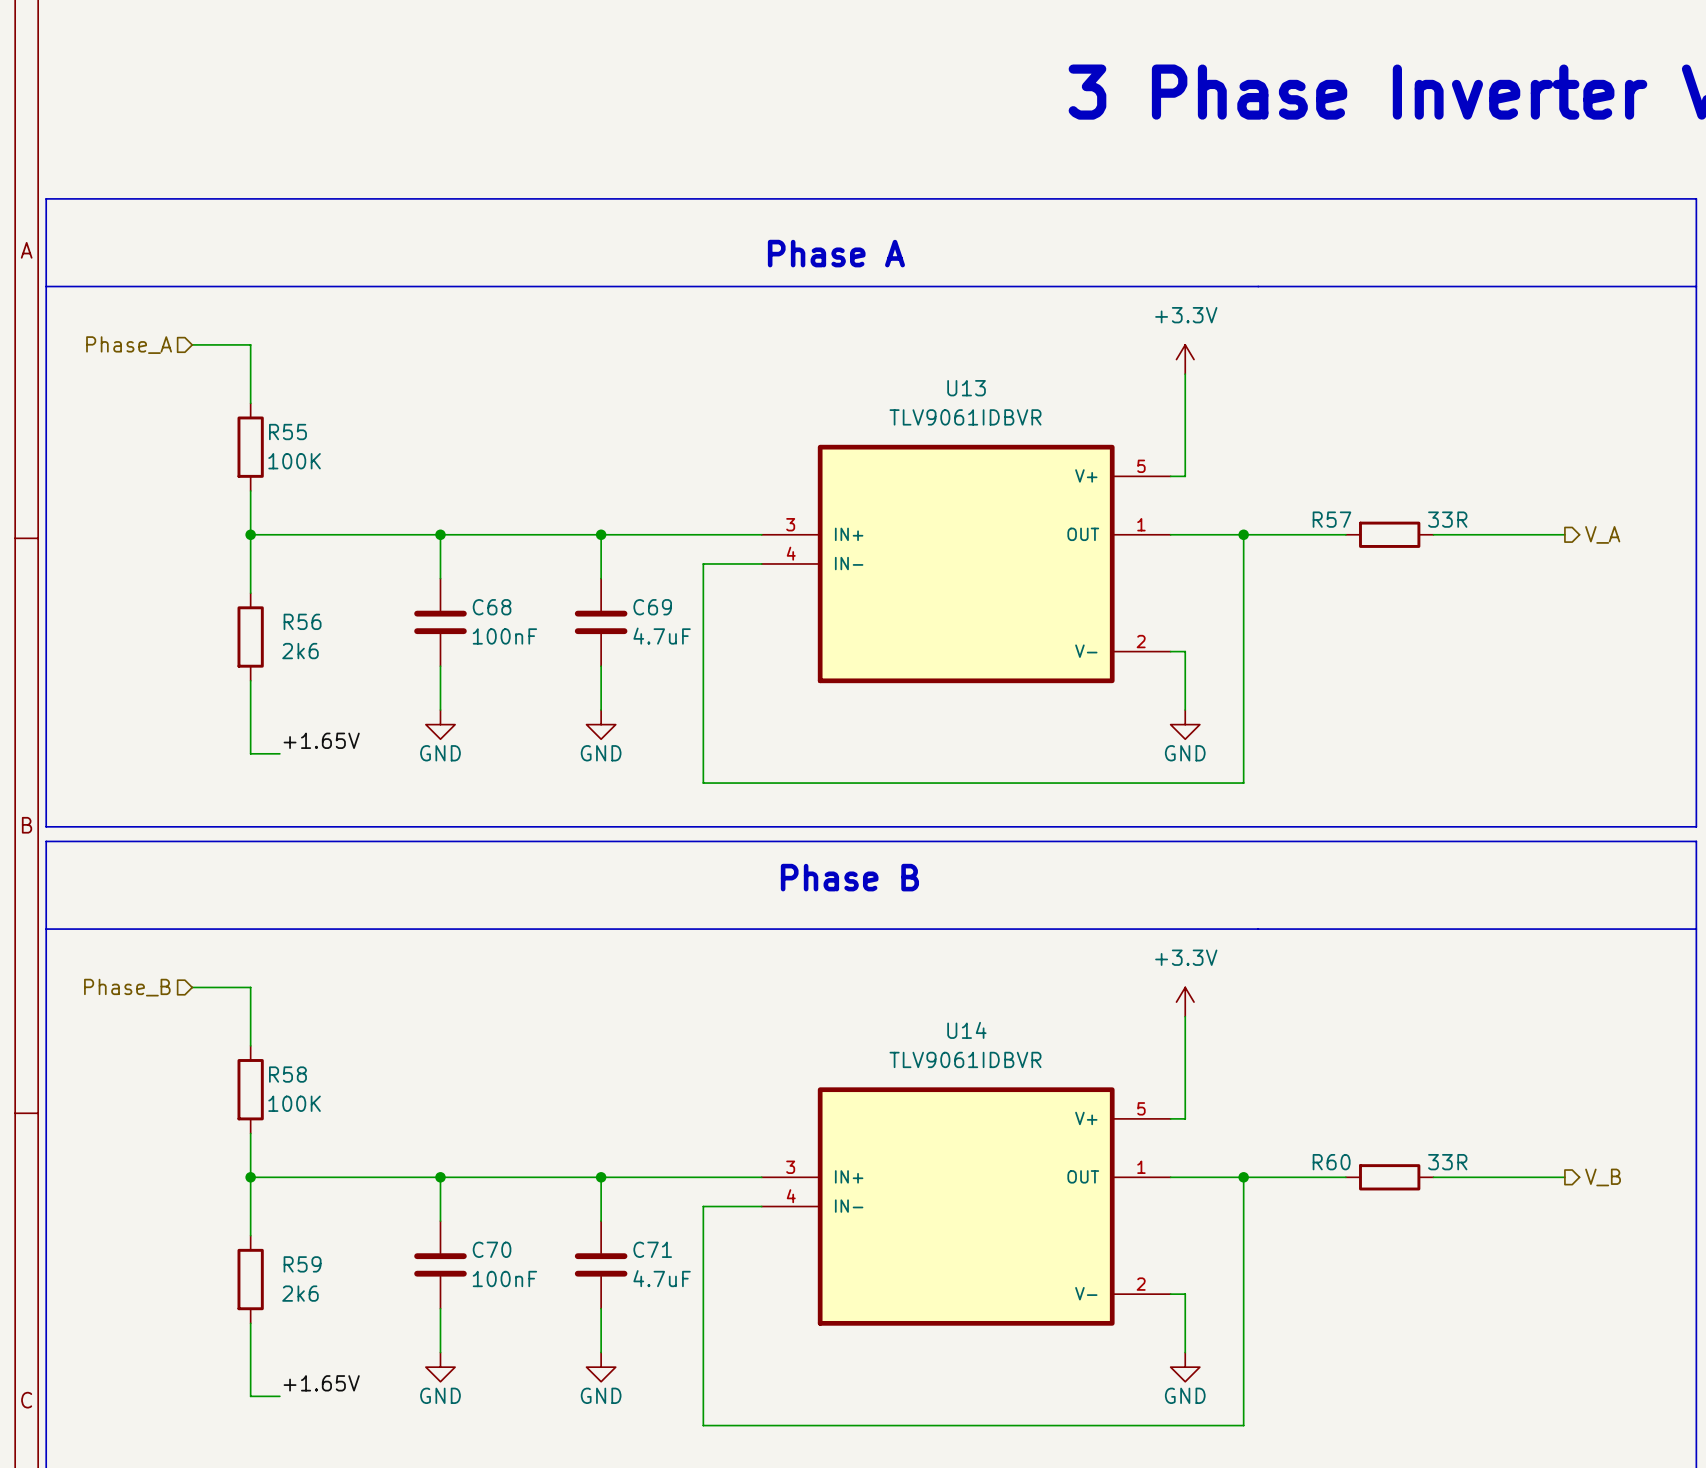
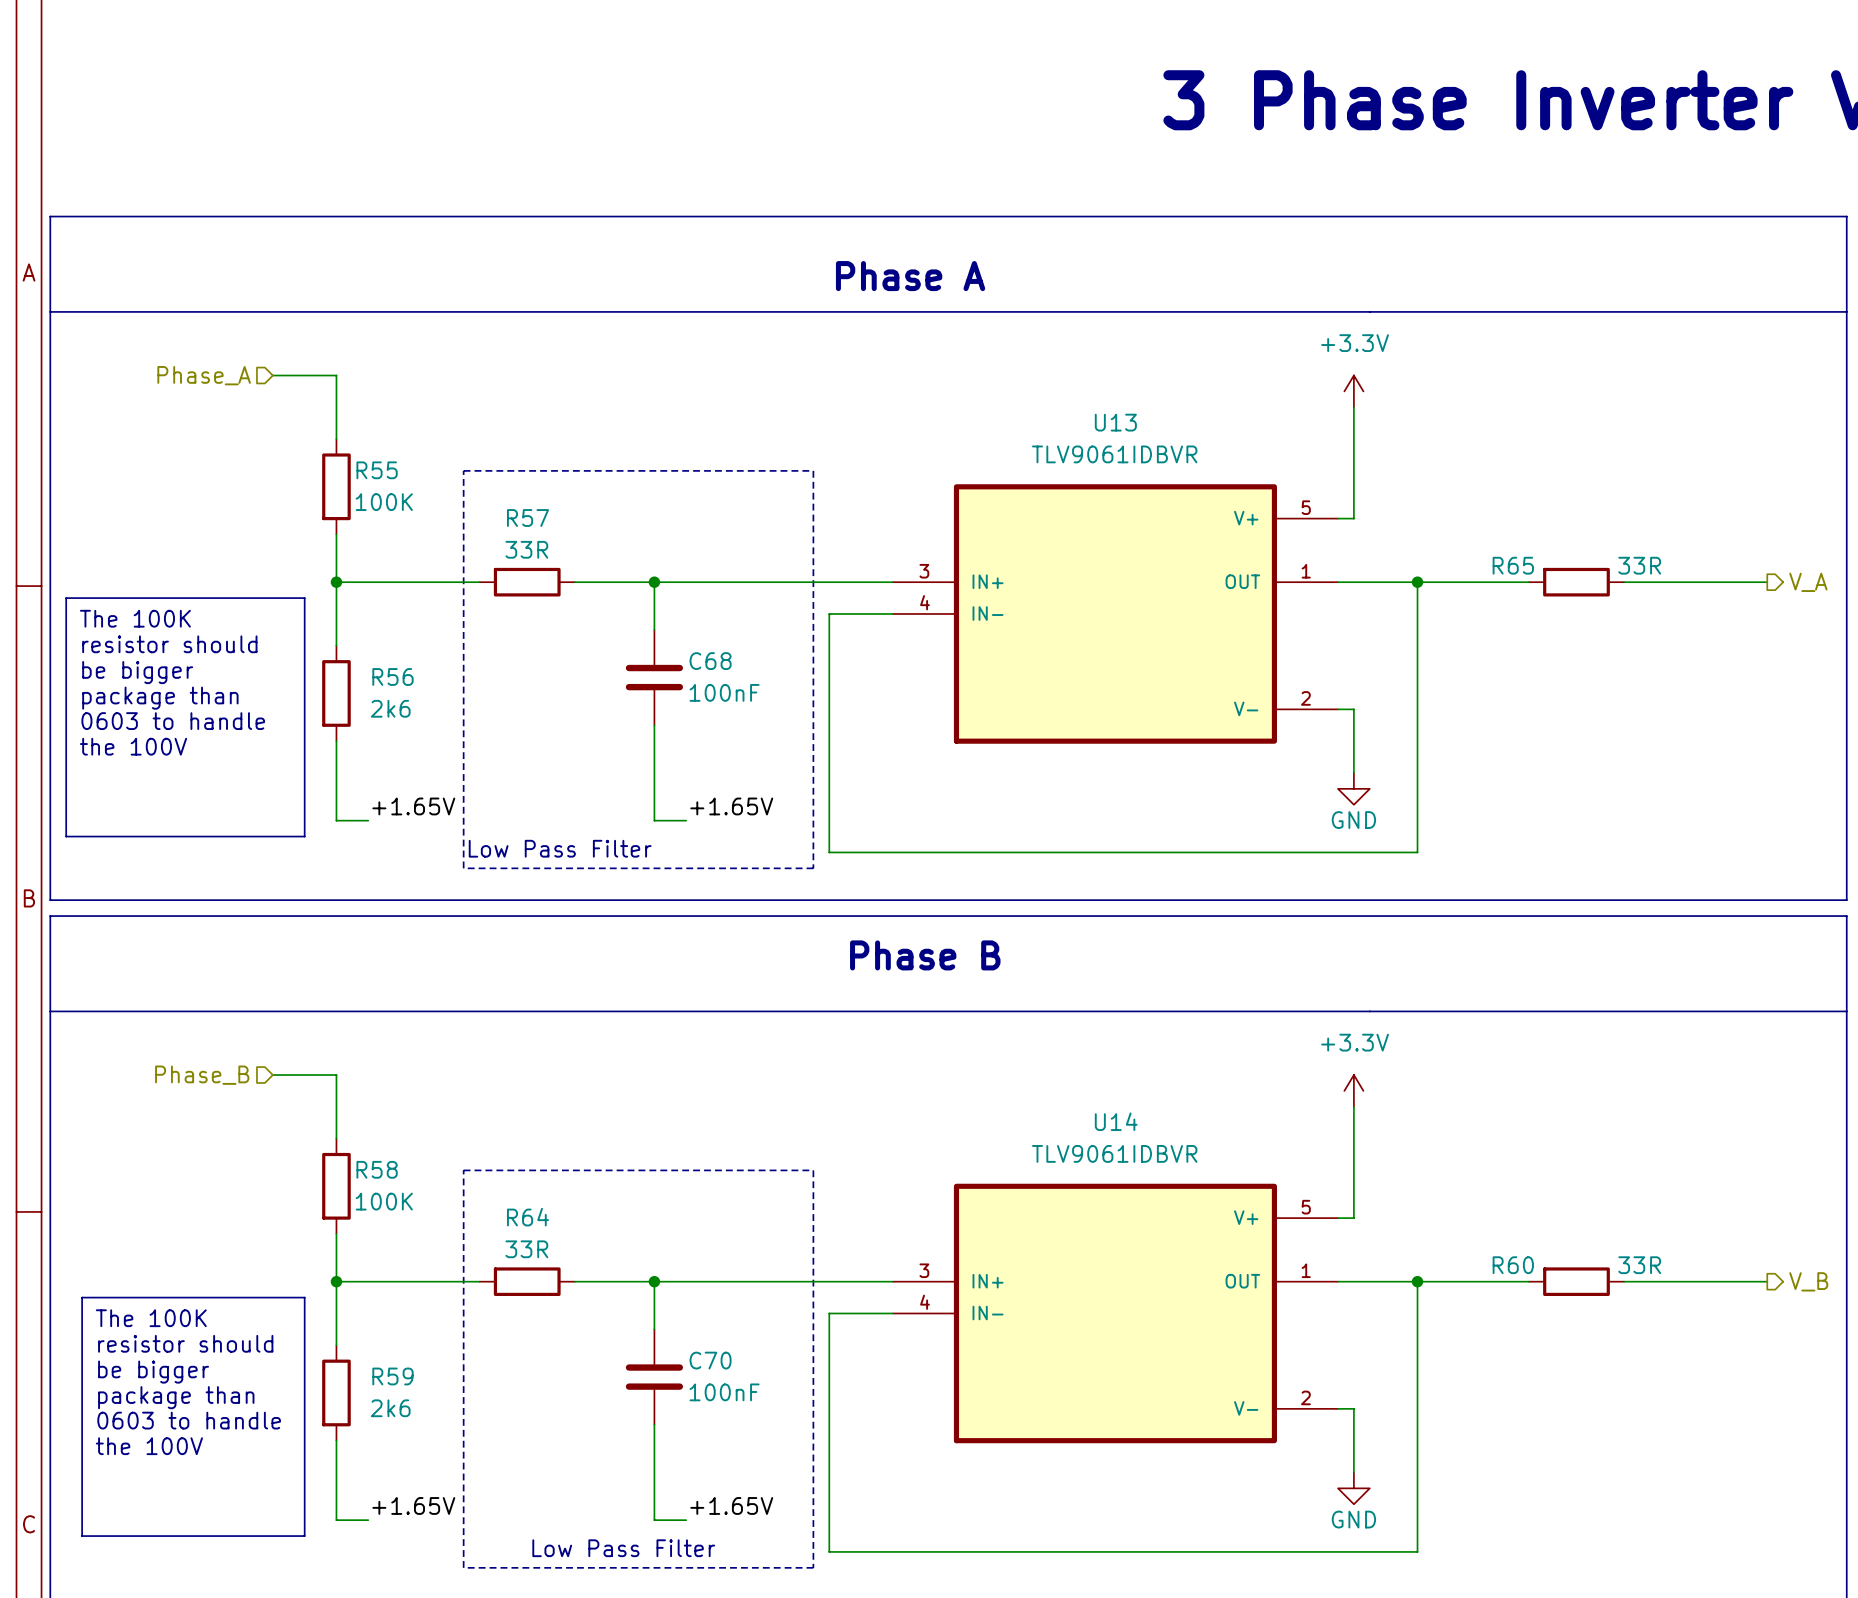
wire: (192, 344) (250, 344) (250, 403) -> (272, 375) (336, 375) (336, 439)
hierarchical label position: Phase_A (129, 345) -> Phase_A (204, 375)
power symbol position: +3.3V (1185, 359) -> +3.3V (1353, 391)
wire: (1185, 374) (1185, 476) (1170, 476) -> (1353, 407) (1353, 518) (1338, 518)
line: none -> (463, 470) (813, 470) (813, 868) (463, 868) (463, 470)
R55 position: (250, 447) -> (336, 486)
wire: (250, 490) (250, 593) -> (336, 534) (336, 645)
R57 name position: R57 (1331, 519) -> R57 (527, 518)
R57 value position: 33R (1447, 519) -> 33R (526, 549)
wire: (250, 534) (309, 534) -> none
junction position: (250, 534) -> (336, 582)
junction: (440, 534) -> none
wire: (528, 534) (440, 534) (440, 578) -> none
wire: (1243, 534) (1243, 651) -> (1338, 709) (1353, 709)
junction position: (1243, 534) -> (1417, 582)
R57 position: (1389, 534) -> (527, 582)
wire: (1433, 534) (1491, 534) -> (1465, 582) (1528, 582)
R65: none -> 33R (1576, 582)
wire: none -> (1703, 582) (1767, 582)
hierarchical label position: V_A (1602, 534) -> V_A (1808, 582)
line: none -> (66, 598) (304, 598) (304, 836) (66, 836) (66, 598)
wire: (761, 563) (703, 563) (703, 783) (761, 783) -> (892, 613) (829, 613) (829, 852)
U13 position: (966, 563) -> (1115, 613)
text: none -> The 100K (135, 618)
text: none -> resistor should (169, 644)
C69 name: C69 (652, 607) -> C68 (710, 661)
text: none -> be bigger (137, 672)
C68: 100nF (440, 622) -> none
C69 value: 4.7uF (662, 636) -> 100nF (724, 692)
R56 position: (250, 637) -> (336, 693)
text: none -> package than (160, 698)
wire: (1170, 651) (1185, 651) (1185, 710) -> none
text: none -> 0603 to handle (173, 721)
wire: (440, 666) (440, 710) -> none
wire: (250, 680) (250, 753) (279, 753) -> (336, 741) (336, 820) (368, 820)
text: none -> the 100V (133, 746)
wire: none -> (654, 772) (654, 820) (686, 820)
wire: (1243, 710) (1243, 783) -> (1417, 582) (1417, 852) (1353, 852)
power symbol: GND (440, 724) -> none
power symbol: GND (601, 724) -> none
power symbol position: GND (1185, 724) -> GND (1353, 788)
label position: +1.65V (321, 740) -> +1.65V (413, 806)
label: none -> +1.65V (731, 806)
text: none -> Low Pass Filter (560, 848)
hierarchical label position: Phase_B (127, 987) -> Phase_B (202, 1075)
wire: (192, 987) (250, 987) (250, 1045) -> (272, 1075) (336, 1075) (336, 1138)
power symbol position: +3.3V (1185, 1002) -> +3.3V (1353, 1090)
wire: (1185, 1016) (1185, 1118) (1170, 1118) -> (1353, 1106) (1353, 1218) (1338, 1218)
line: none -> (463, 1170) (463, 1567) (813, 1567) (813, 1170) (463, 1170)
R58 position: (250, 1089) -> (336, 1186)
wire: (250, 1133) (250, 1235) -> (336, 1233) (336, 1345)
wire: (250, 1177) (309, 1177) -> none
junction position: (250, 1177) -> (336, 1281)
junction: (440, 1177) -> none
R64: none -> 33R (527, 1281)
wire: (528, 1177) (440, 1177) (440, 1221) -> none
wire: (1243, 1177) (1243, 1294) -> (1338, 1408) (1353, 1408)
junction position: (1243, 1177) -> (1417, 1281)
R60 position: (1389, 1177) -> (1576, 1281)
wire: (1433, 1177) (1491, 1177) -> (1465, 1281) (1528, 1281)
wire: none -> (1703, 1281) (1767, 1281)
hierarchical label position: V_B (1603, 1177) -> V_B (1808, 1281)
line: none -> (82, 1297) (304, 1297) (304, 1536) (82, 1536) (82, 1297)
wire: (761, 1206) (703, 1206) (703, 1425) (761, 1425) -> (892, 1313) (829, 1313) (829, 1551)
U14 position: (966, 1206) -> (1115, 1313)
text: none -> The 100K (151, 1318)
text: none -> resistor should (185, 1343)
C71 name: C71 (652, 1249) -> C70 (710, 1360)
text: none -> be bigger (153, 1372)
C70: 100nF (440, 1264) -> none
C71 value: 4.7uF (662, 1278) -> 100nF (724, 1392)
R59 position: (250, 1279) -> (336, 1392)
text: none -> package than (176, 1397)
wire: (1170, 1294) (1185, 1294) (1185, 1352) -> none
text: none -> 0603 to handle (189, 1420)
wire: (440, 1308) (440, 1352) -> none
wire: (250, 1323) (250, 1396) (279, 1396) -> (336, 1440) (336, 1520) (368, 1520)
text: none -> the 100V (149, 1446)
wire: none -> (654, 1472) (654, 1520) (686, 1520)
wire: (1243, 1352) (1243, 1425) -> (1417, 1281) (1417, 1551) (1353, 1551)
power symbol: GND (440, 1367) -> none
power symbol: GND (601, 1367) -> none
power symbol position: GND (1185, 1367) -> GND (1353, 1488)
label position: +1.65V (321, 1383) -> +1.65V (413, 1505)
label: none -> +1.65V (731, 1505)
text: none -> Low Pass Filter (623, 1548)

